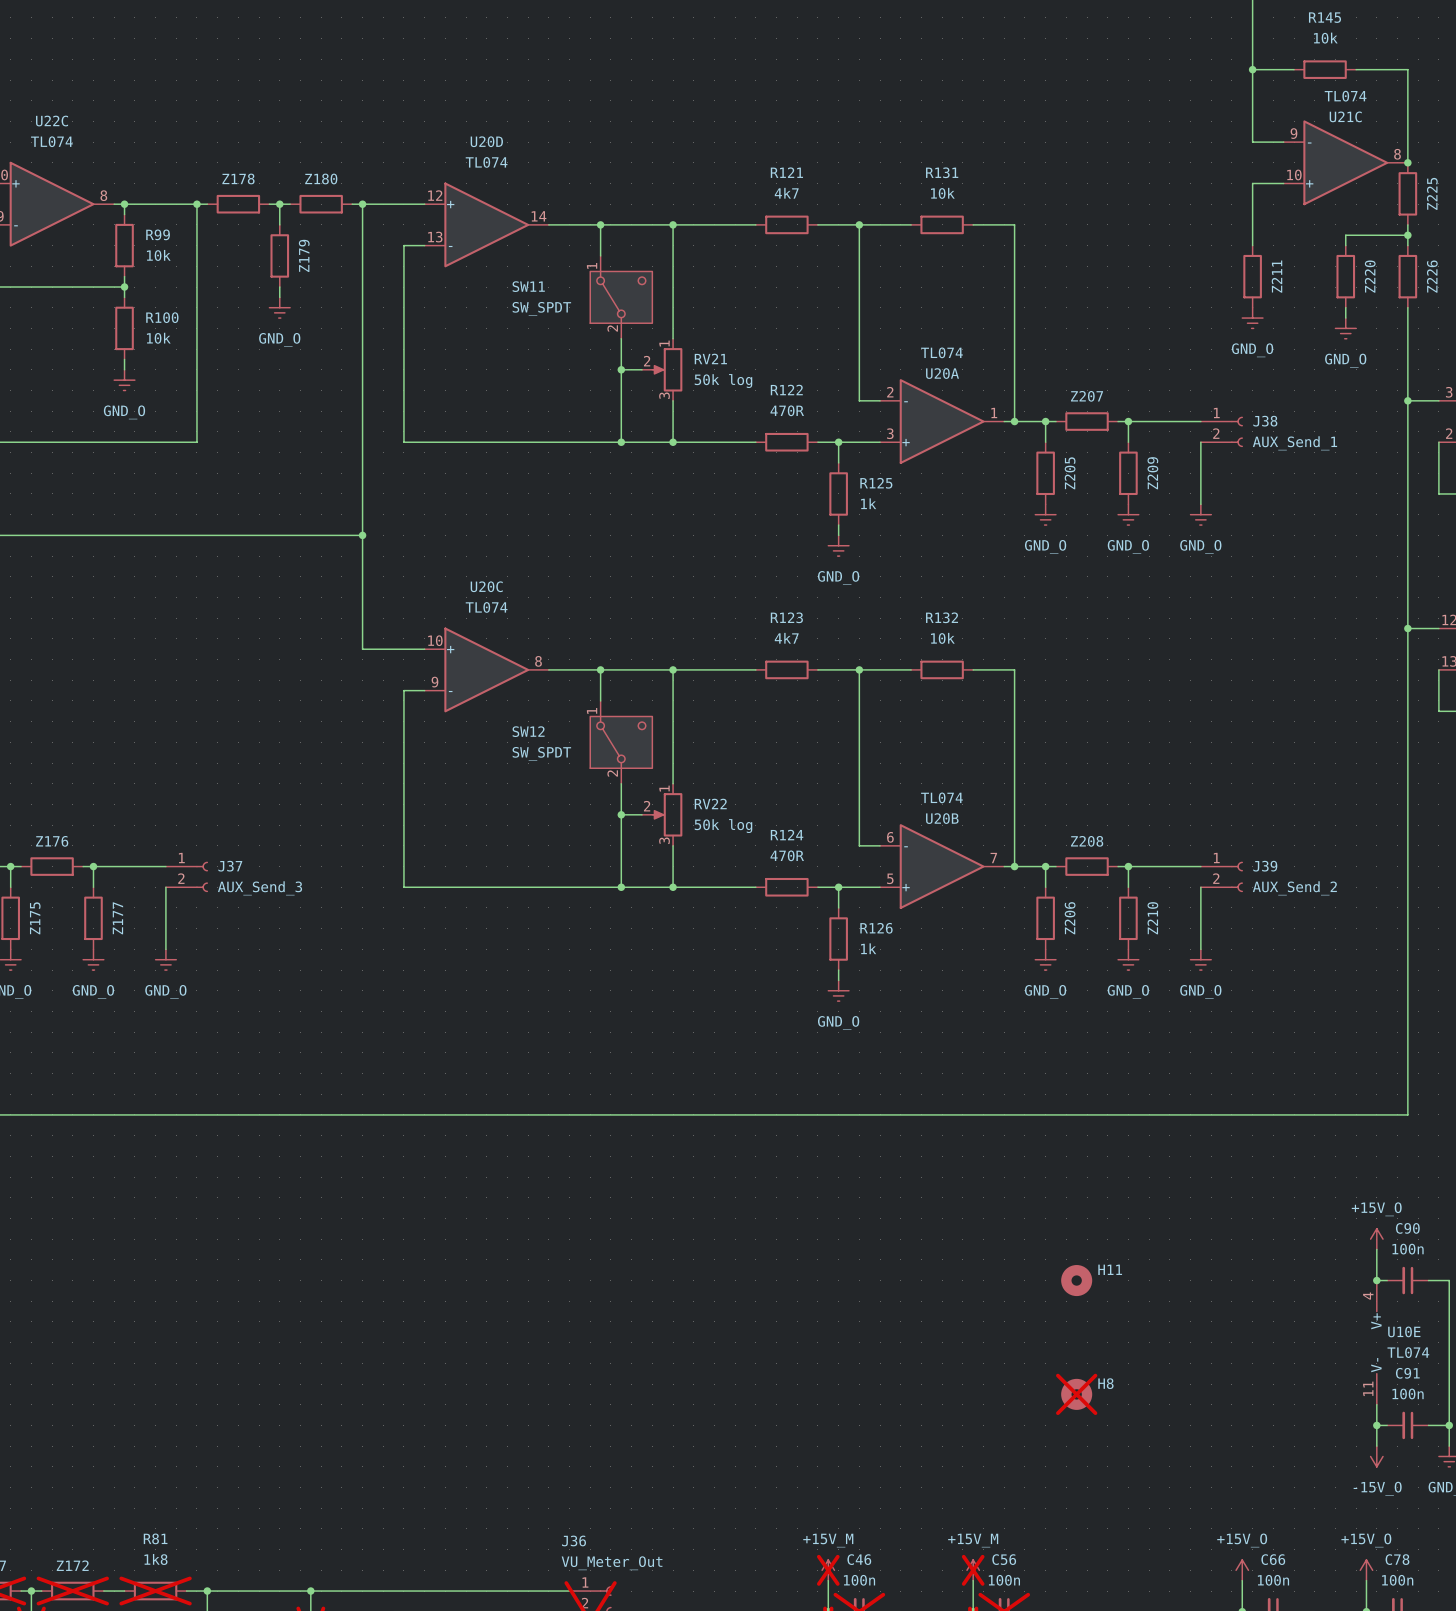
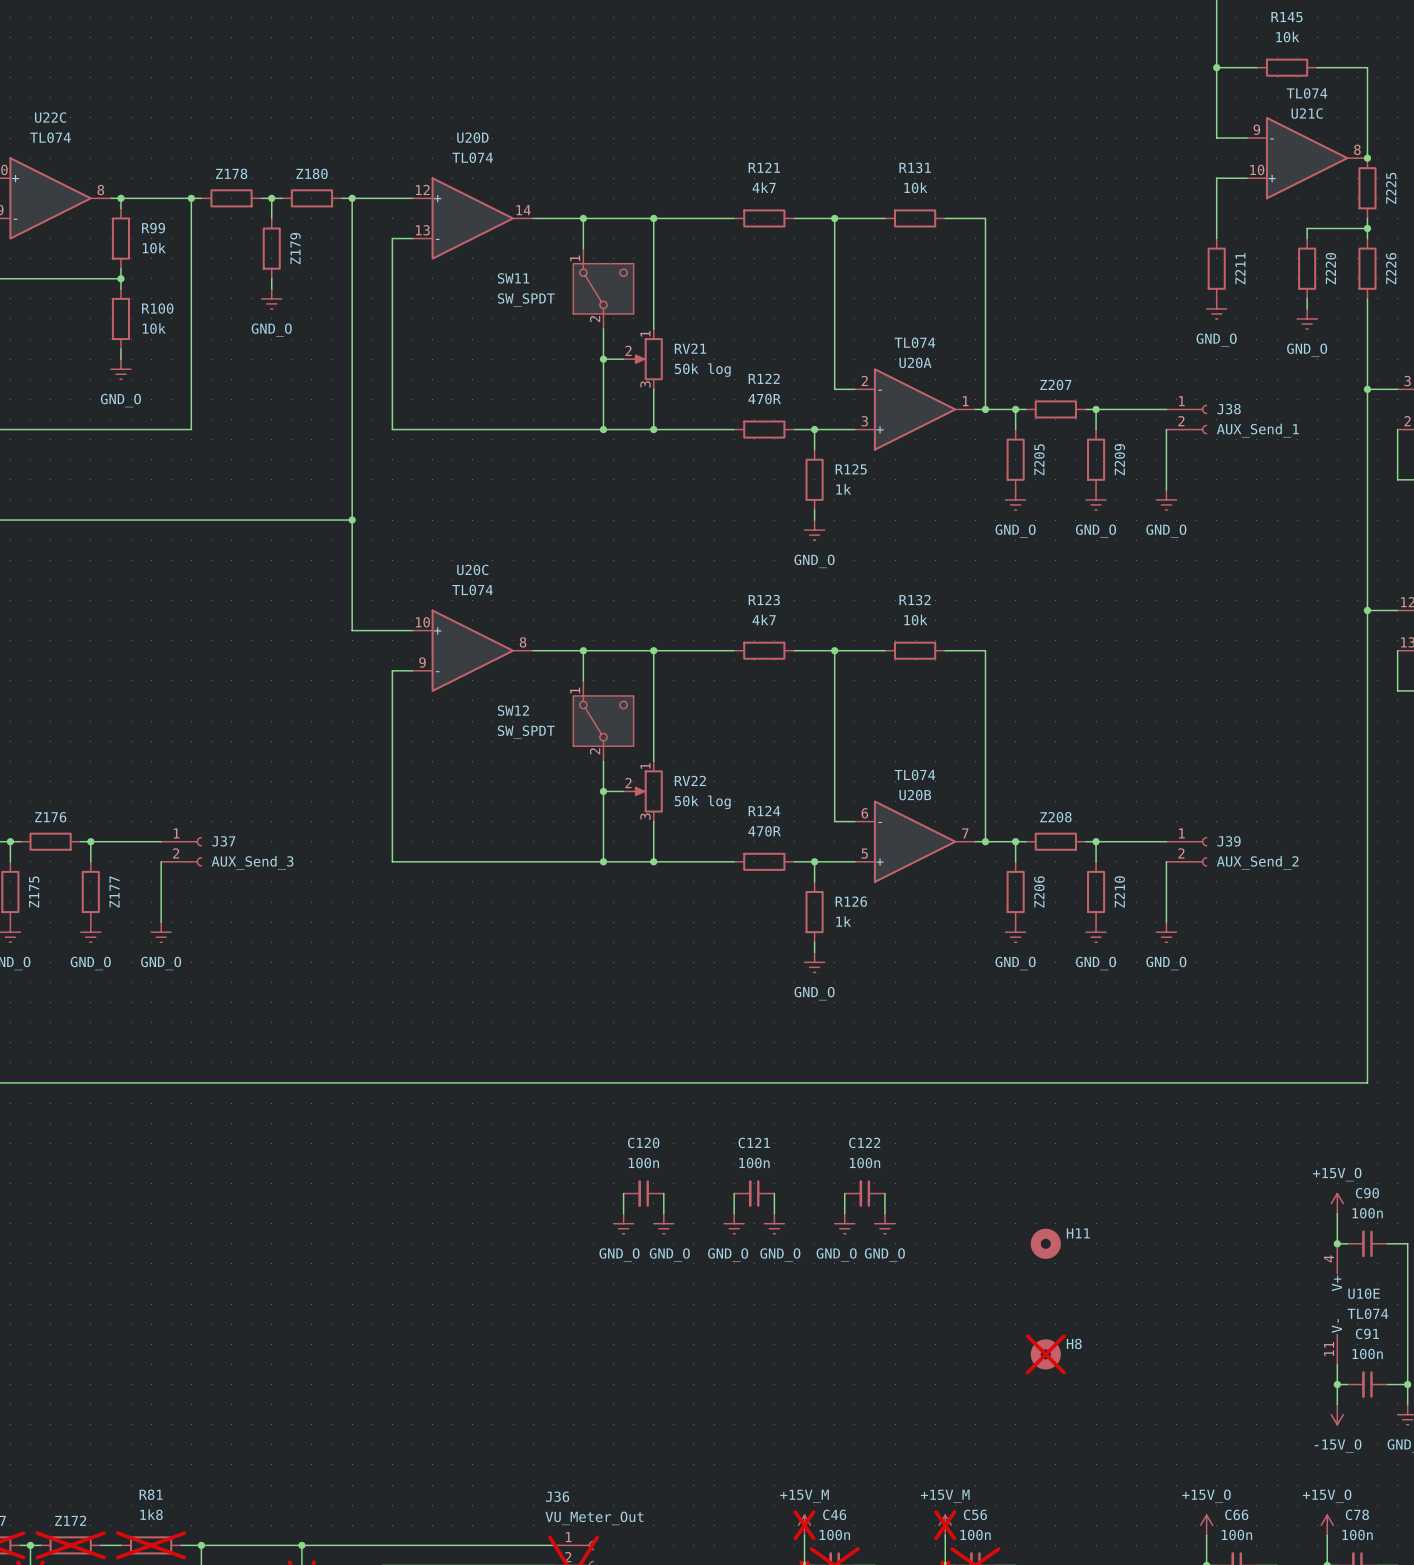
wire: none -> (623, 1193) (623, 1213)
C120: none -> 100n (643, 1193)
wire: none -> (663, 1193) (663, 1213)
wire: none -> (734, 1193) (734, 1213)
C121: none -> 100n (754, 1193)
wire: none -> (774, 1193) (774, 1213)
wire: none -> (844, 1193) (844, 1213)
C122: none -> 100n (864, 1193)
wire: none -> (884, 1193) (884, 1213)
power symbol: none -> GND_O (623, 1223)
power symbol: none -> GND_O (663, 1223)
power symbol: none -> GND_O (734, 1223)
power symbol: none -> GND_O (774, 1223)
power symbol: none -> GND_O (844, 1223)
power symbol: none -> GND_O (884, 1223)

